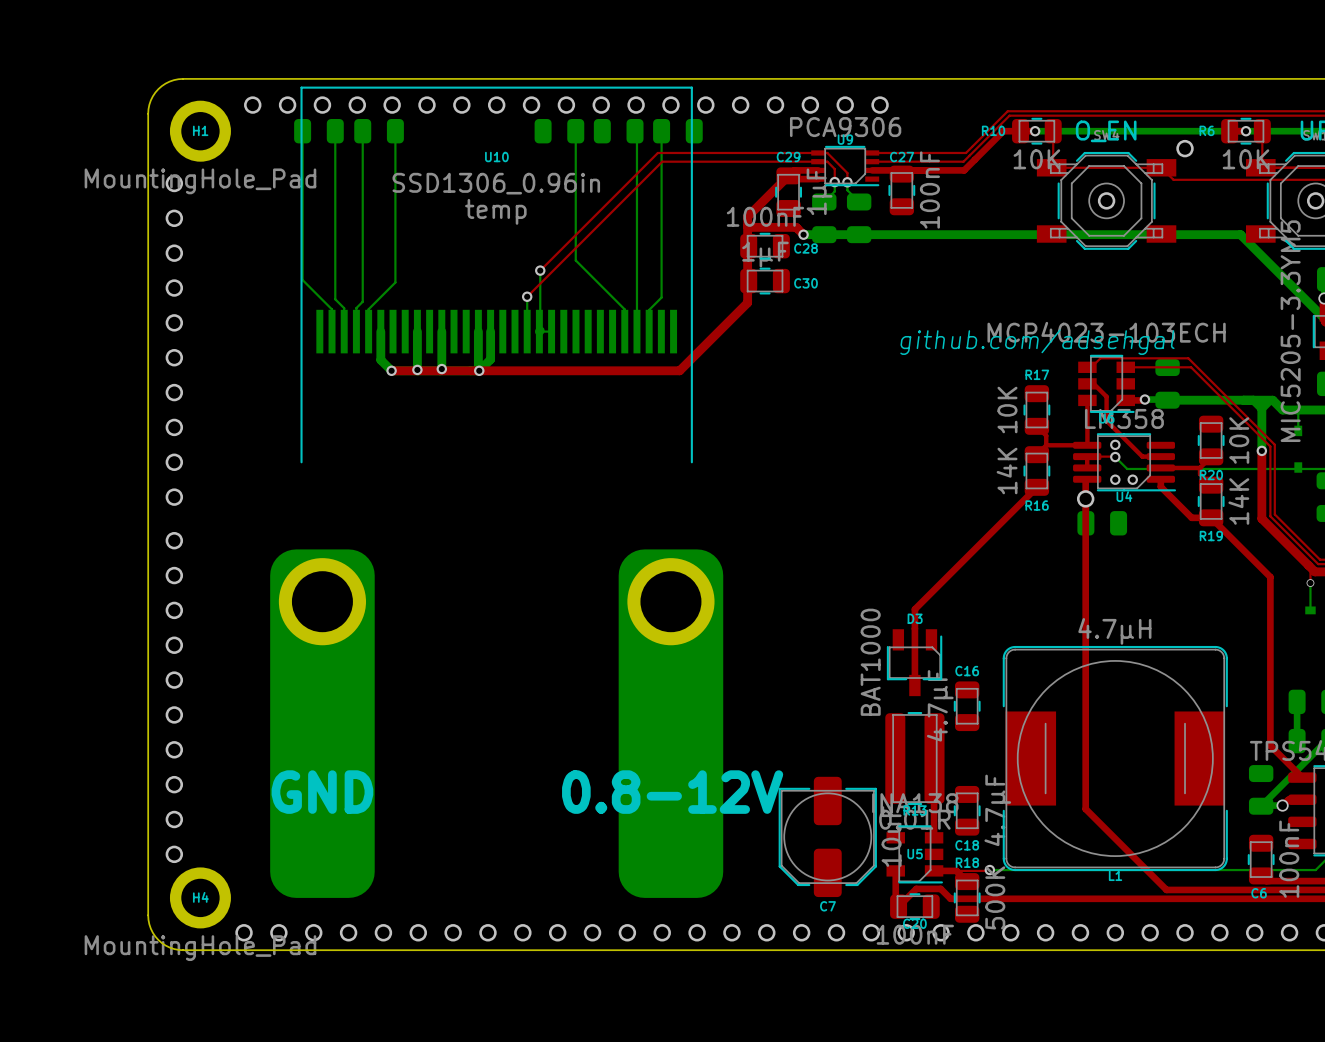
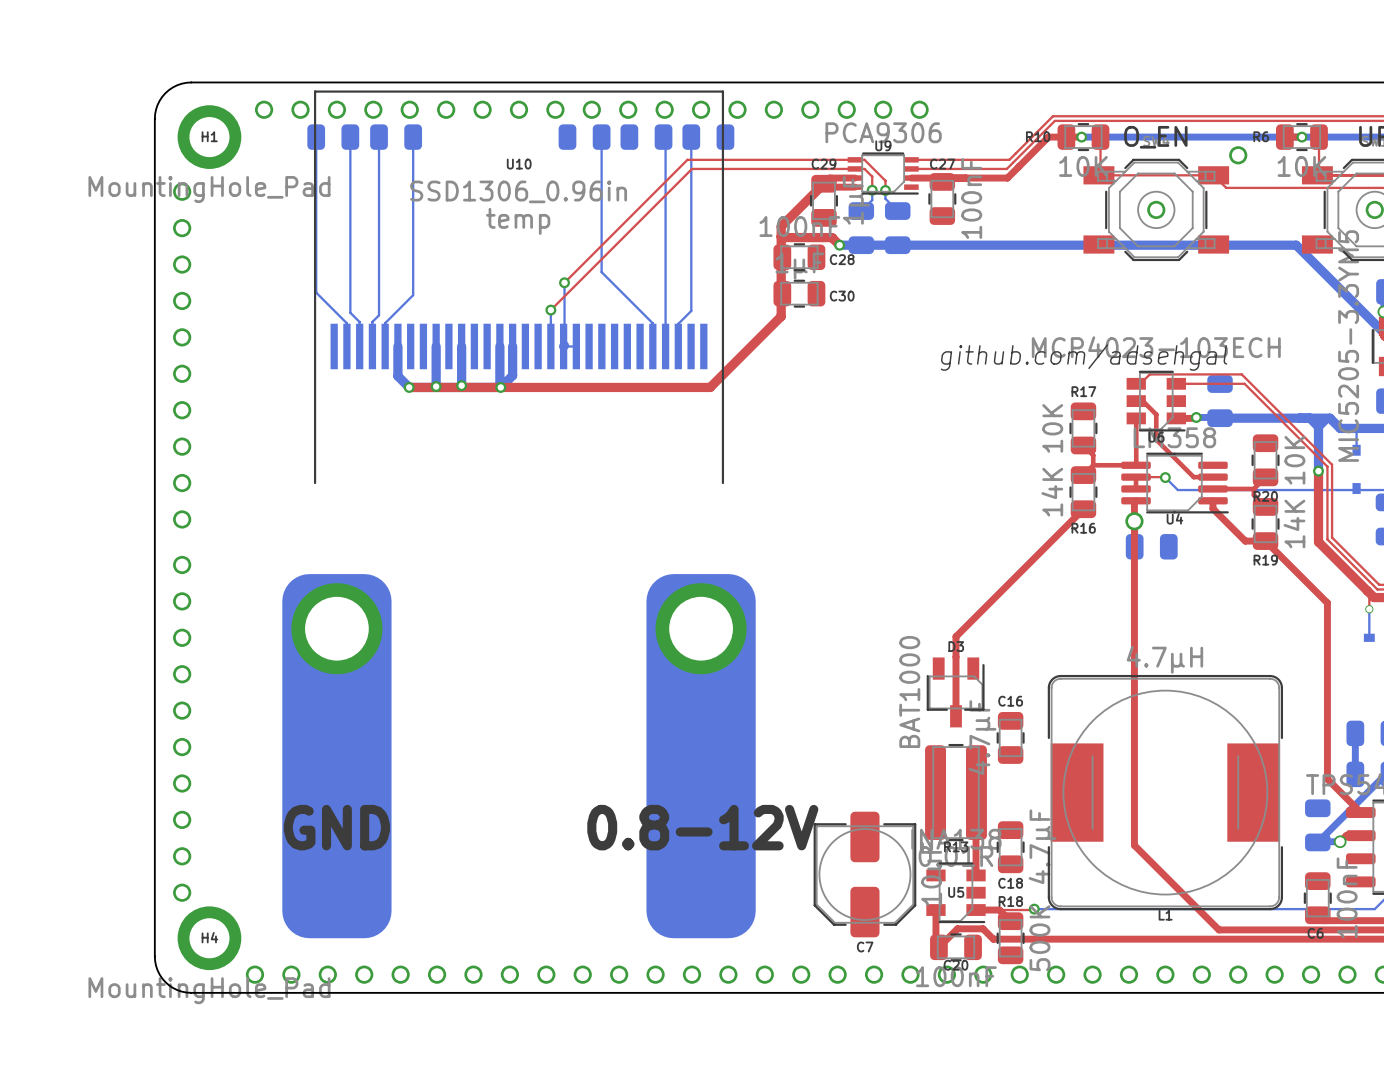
via: (1115, 444) -> none
via: (1115, 479) -> none
via: (1132, 479) -> none

